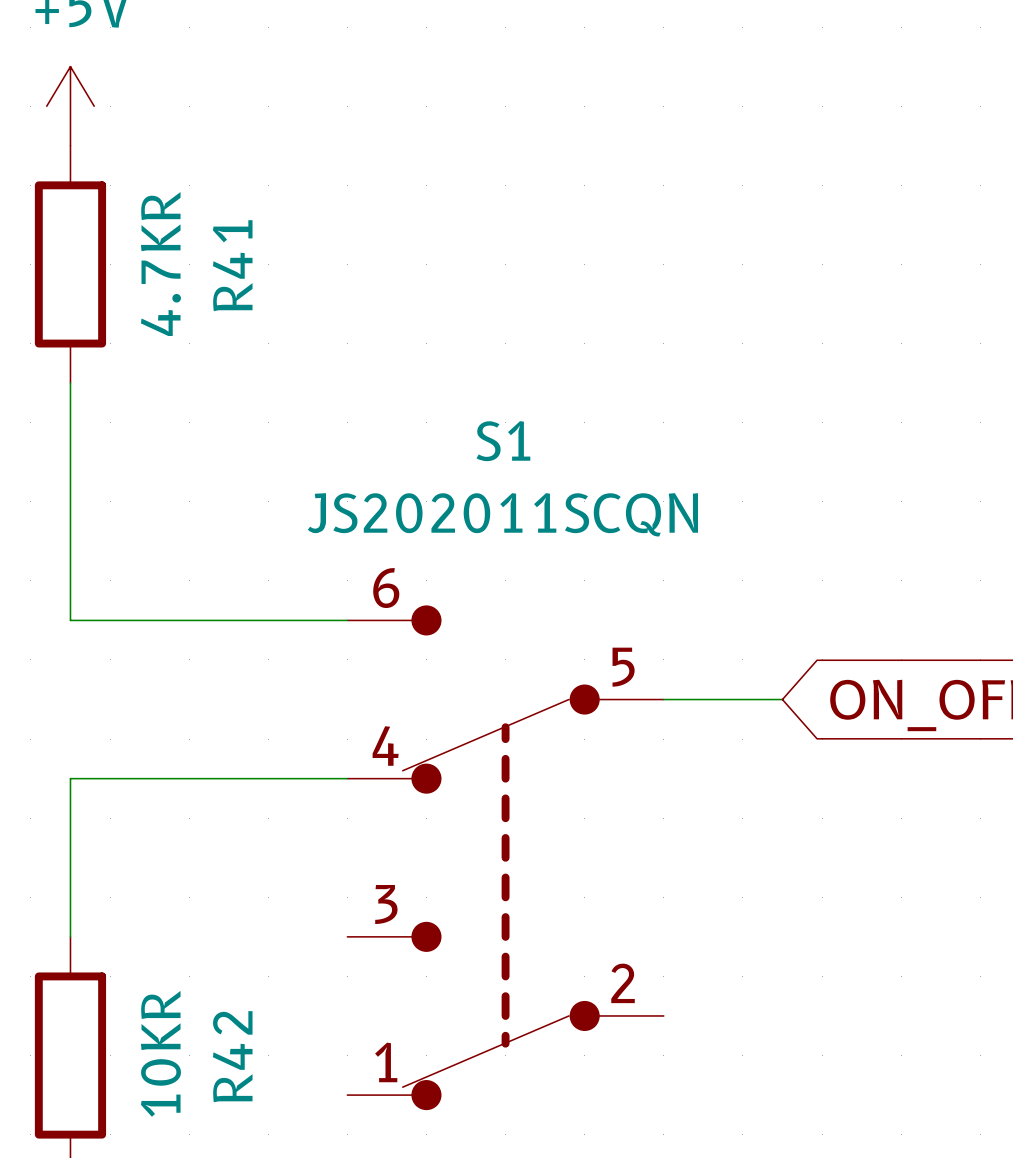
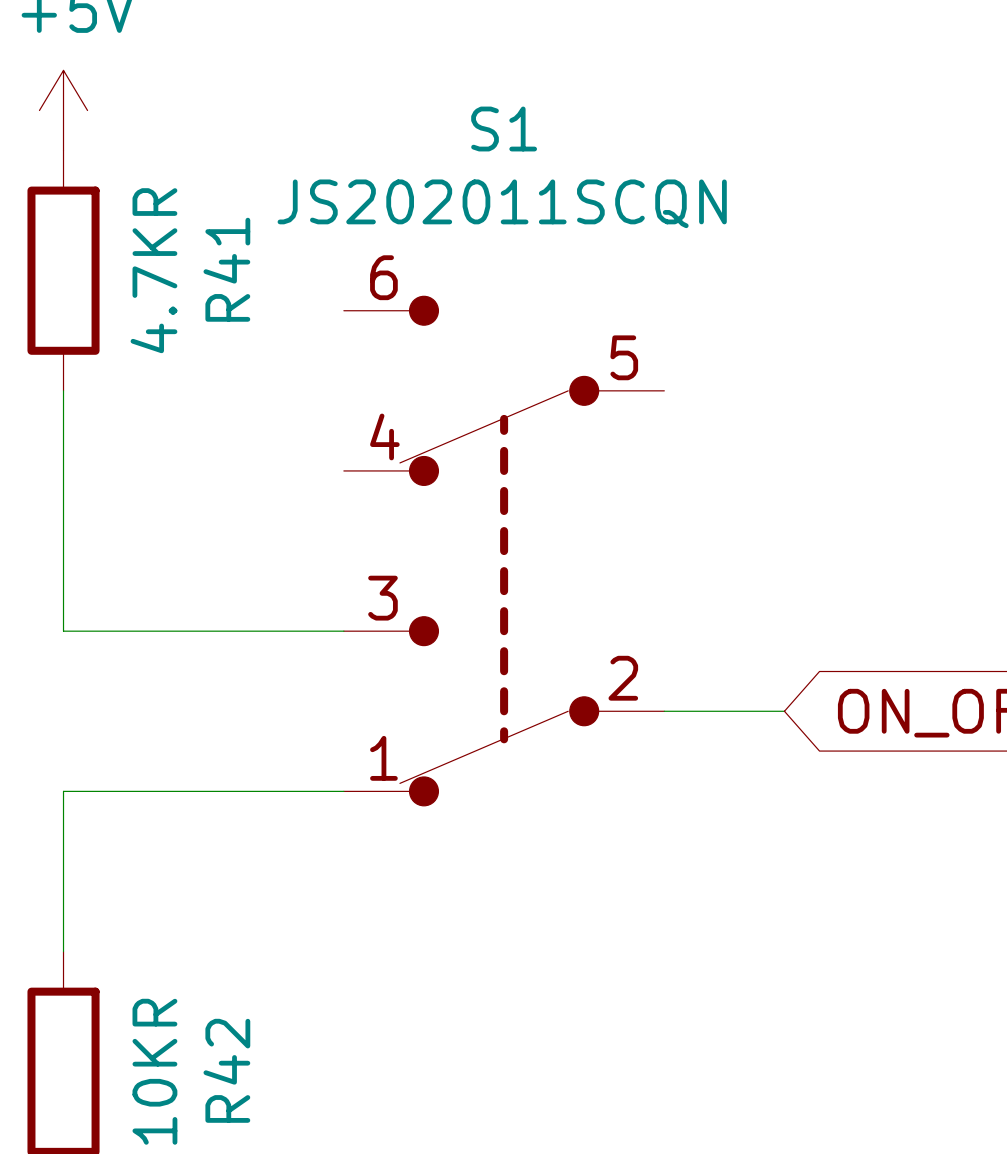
S1 position: (505, 857) -> (504, 551)

